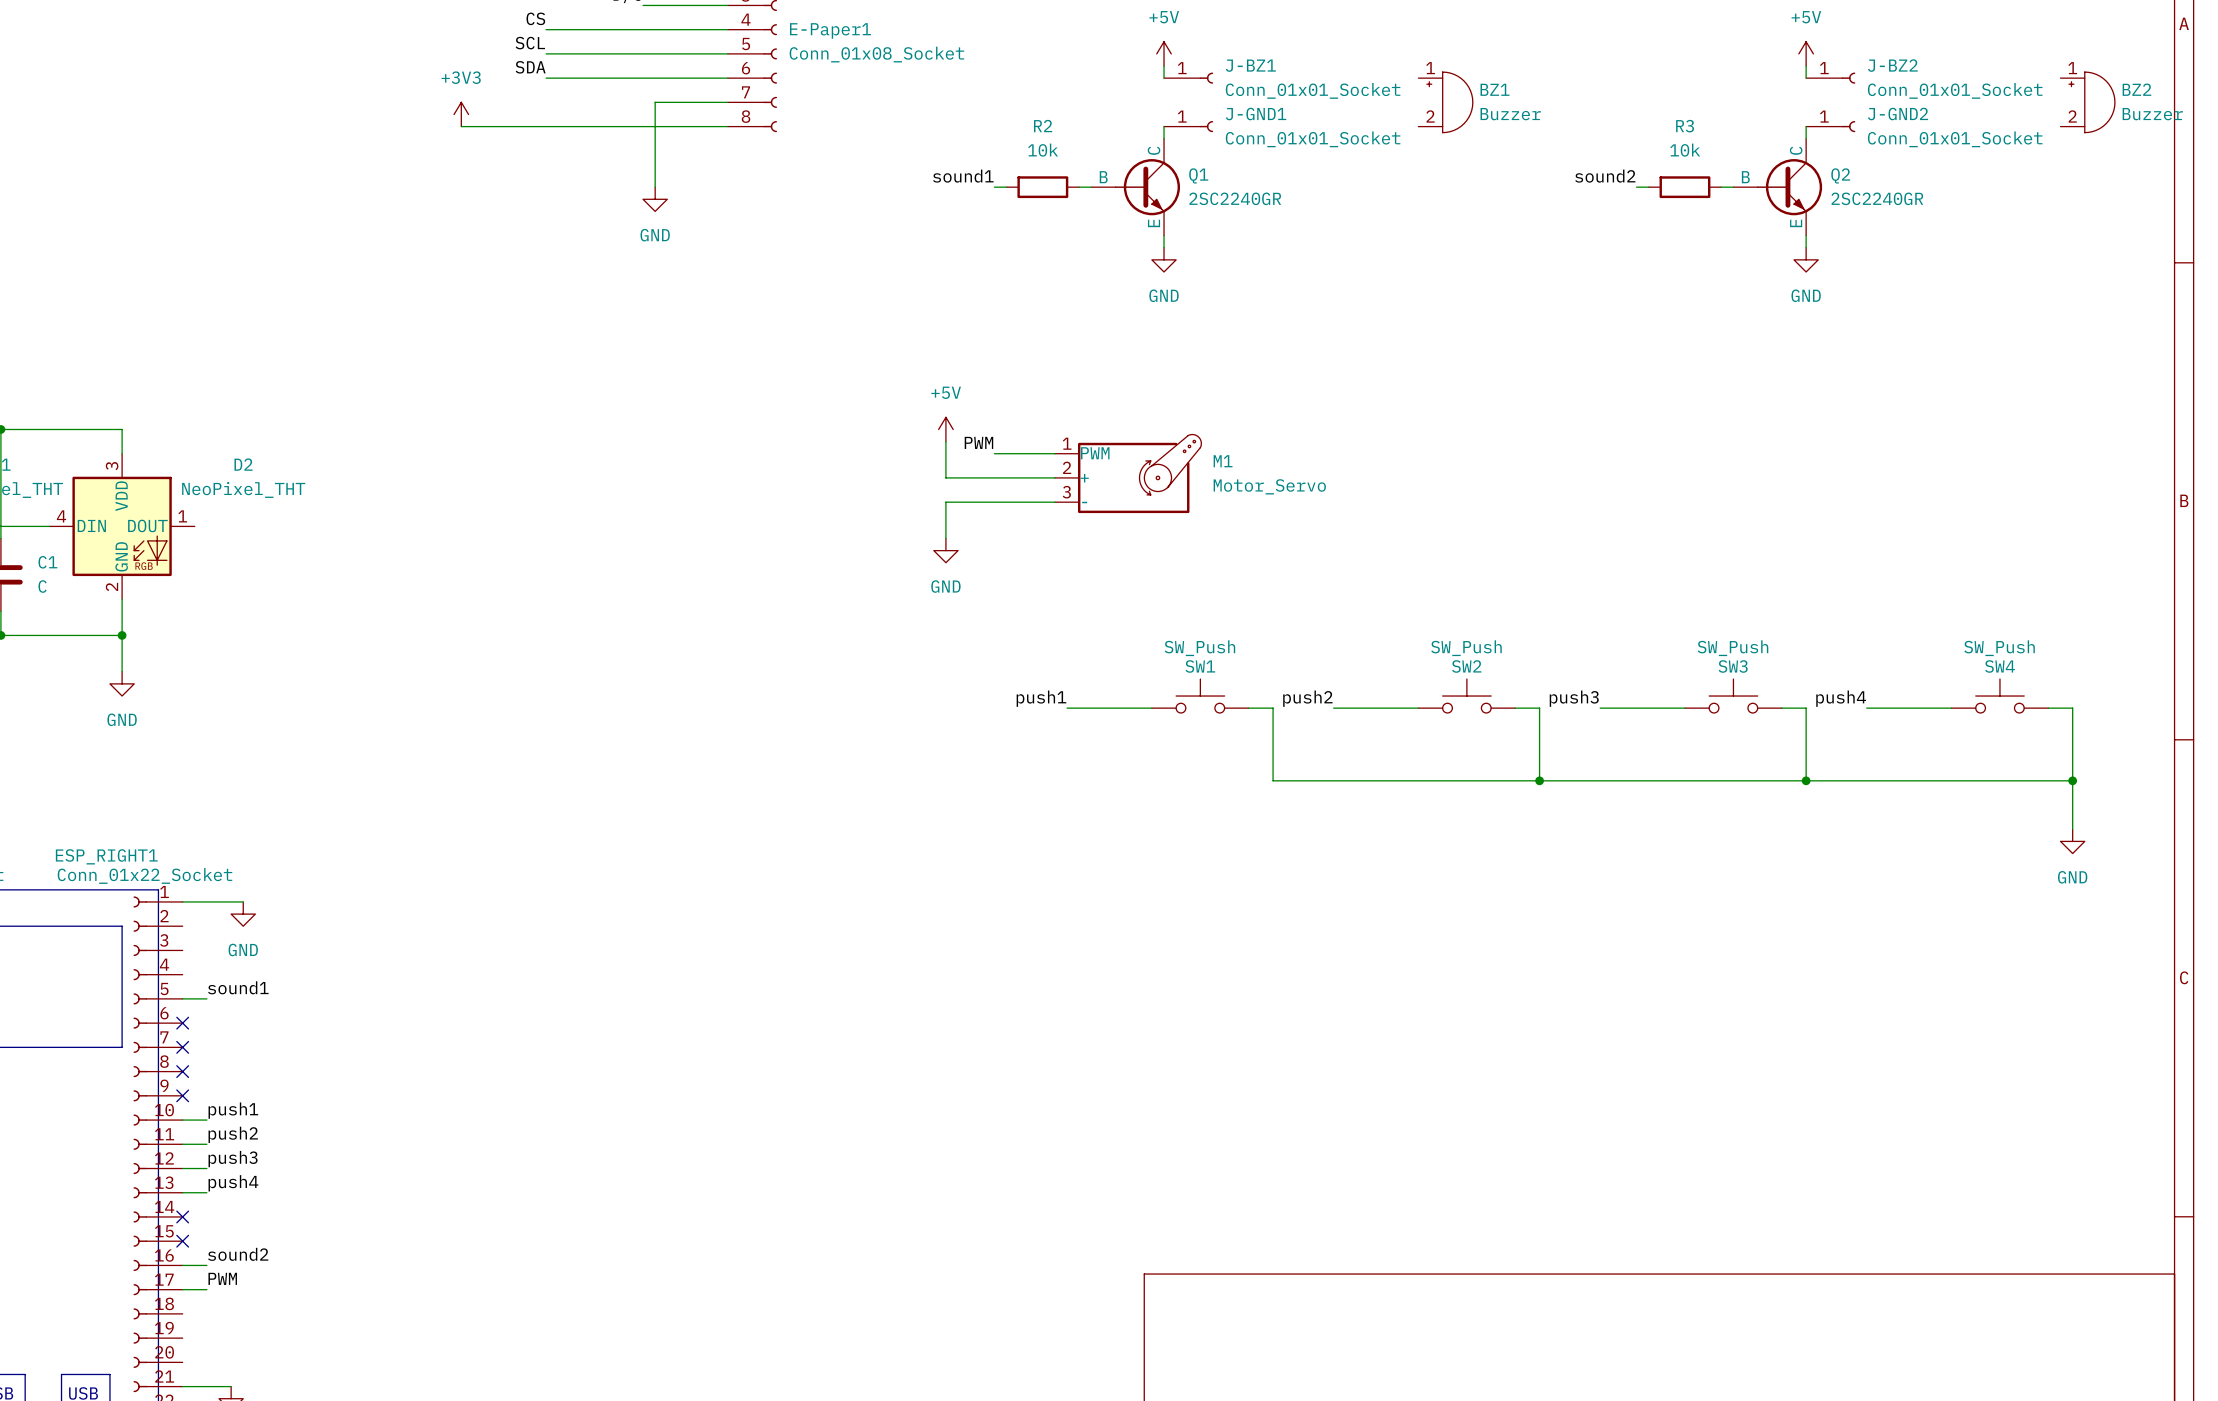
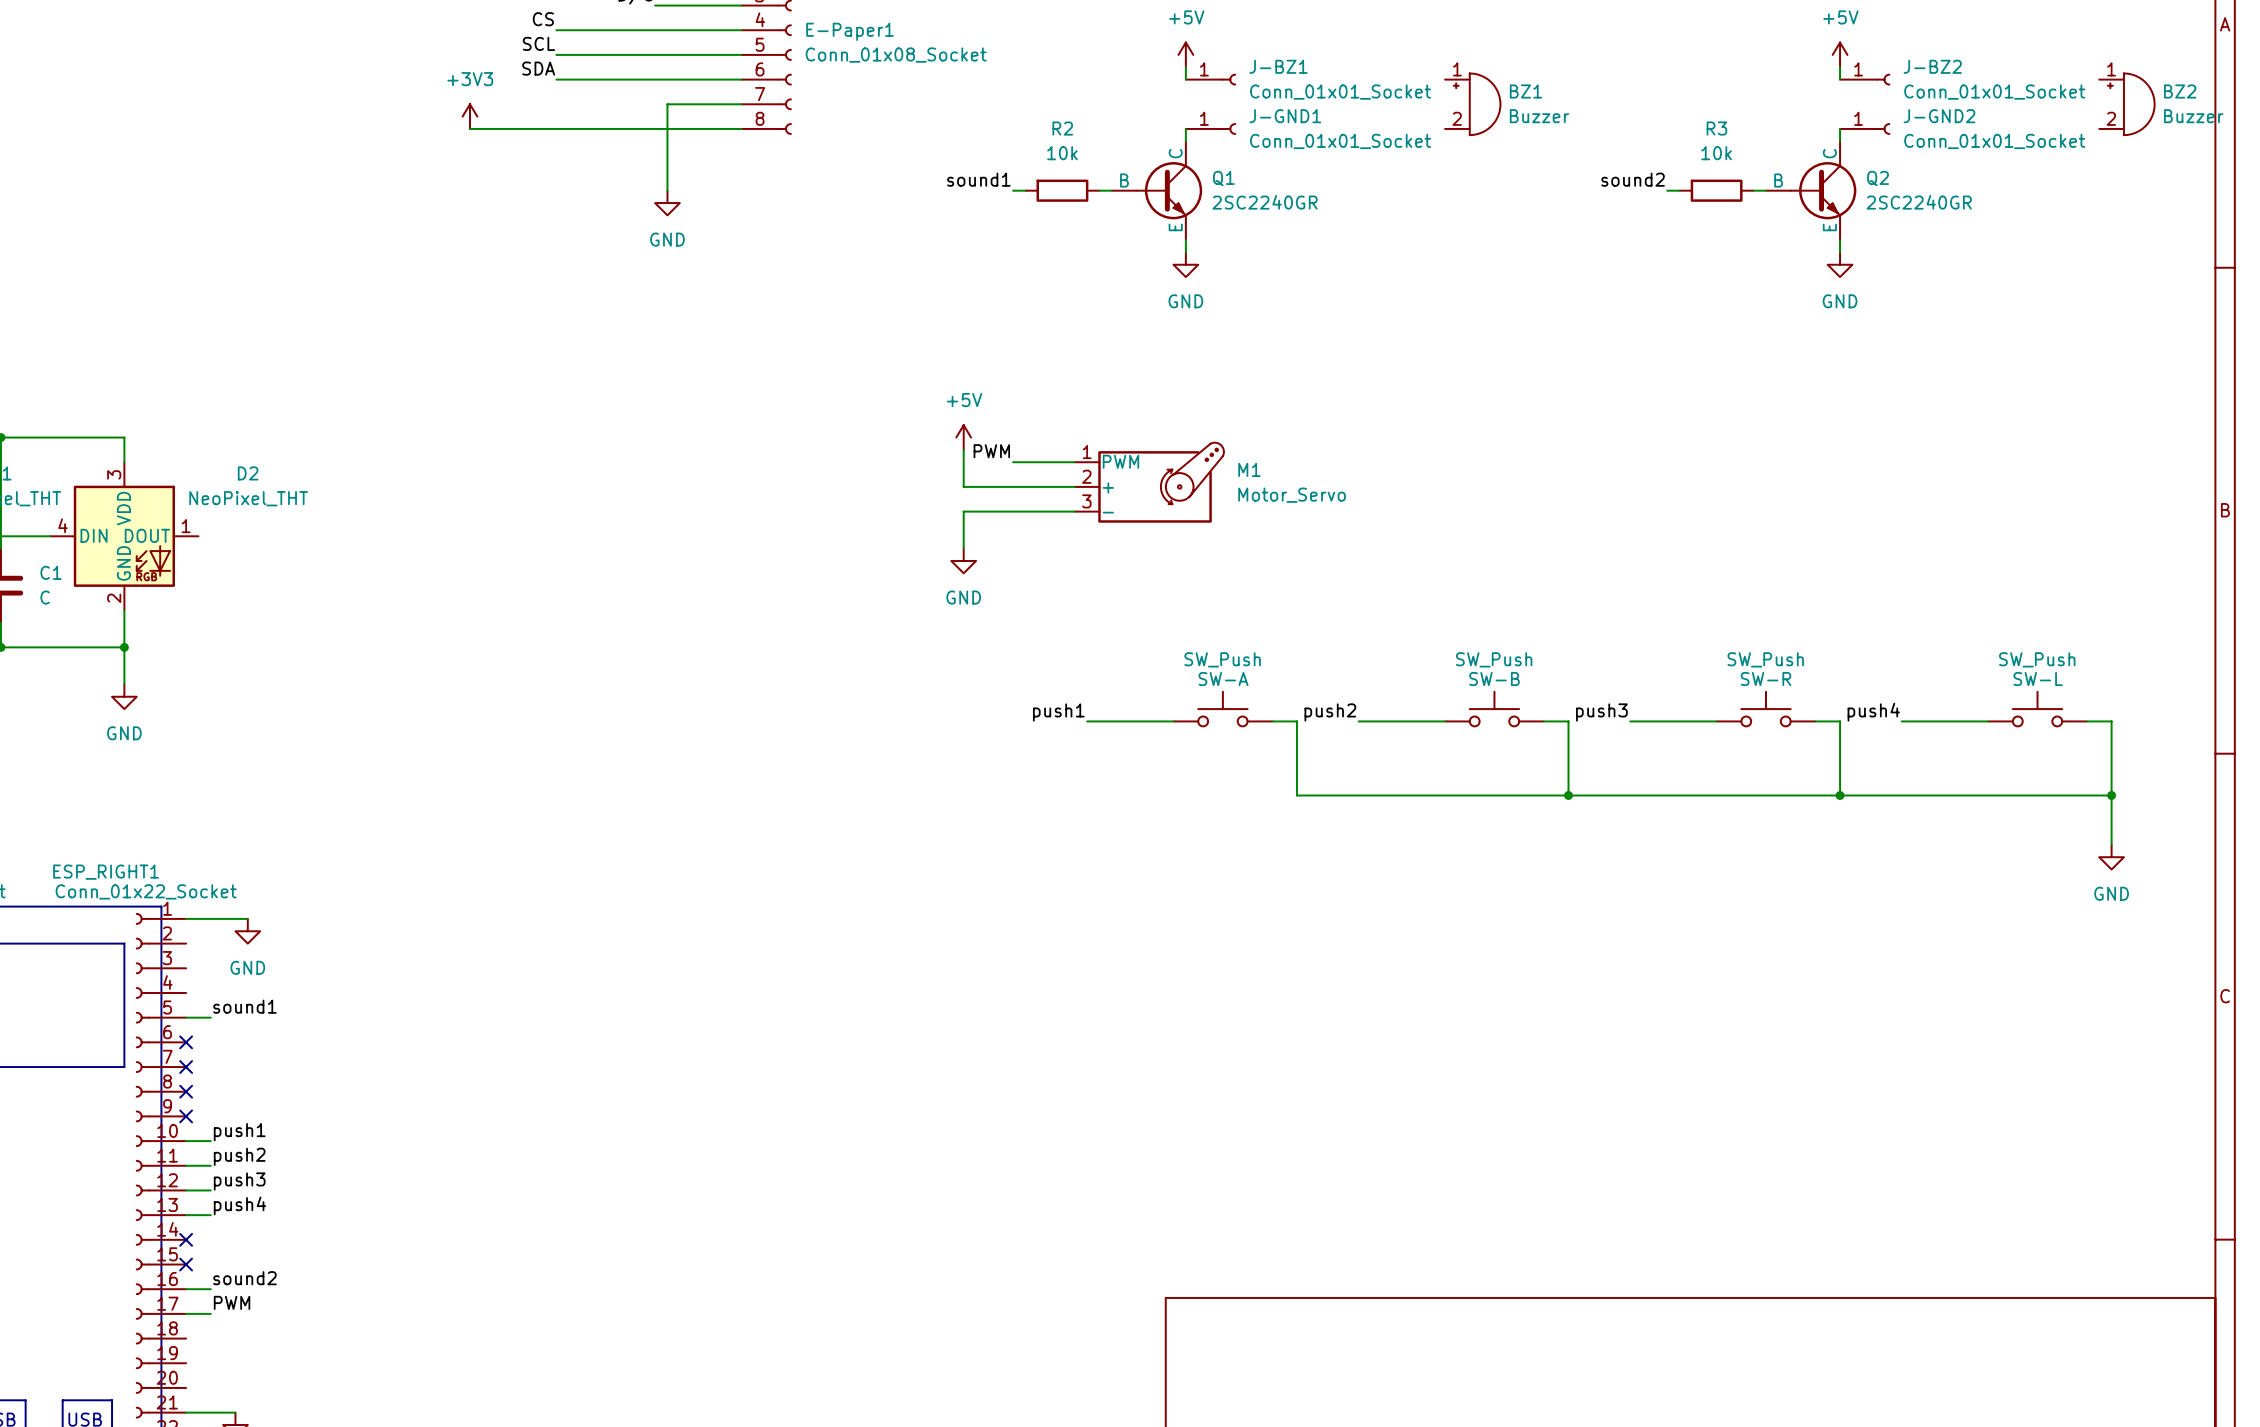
SW1 name: SW1 (1200, 666) -> SW-A (1223, 679)
SW2 name: SW2 (1466, 666) -> SW-B (1494, 679)
SW3 name: SW3 (1733, 666) -> SW-R (1765, 679)
SW4 name: SW4 (2000, 666) -> SW-L (2038, 679)

